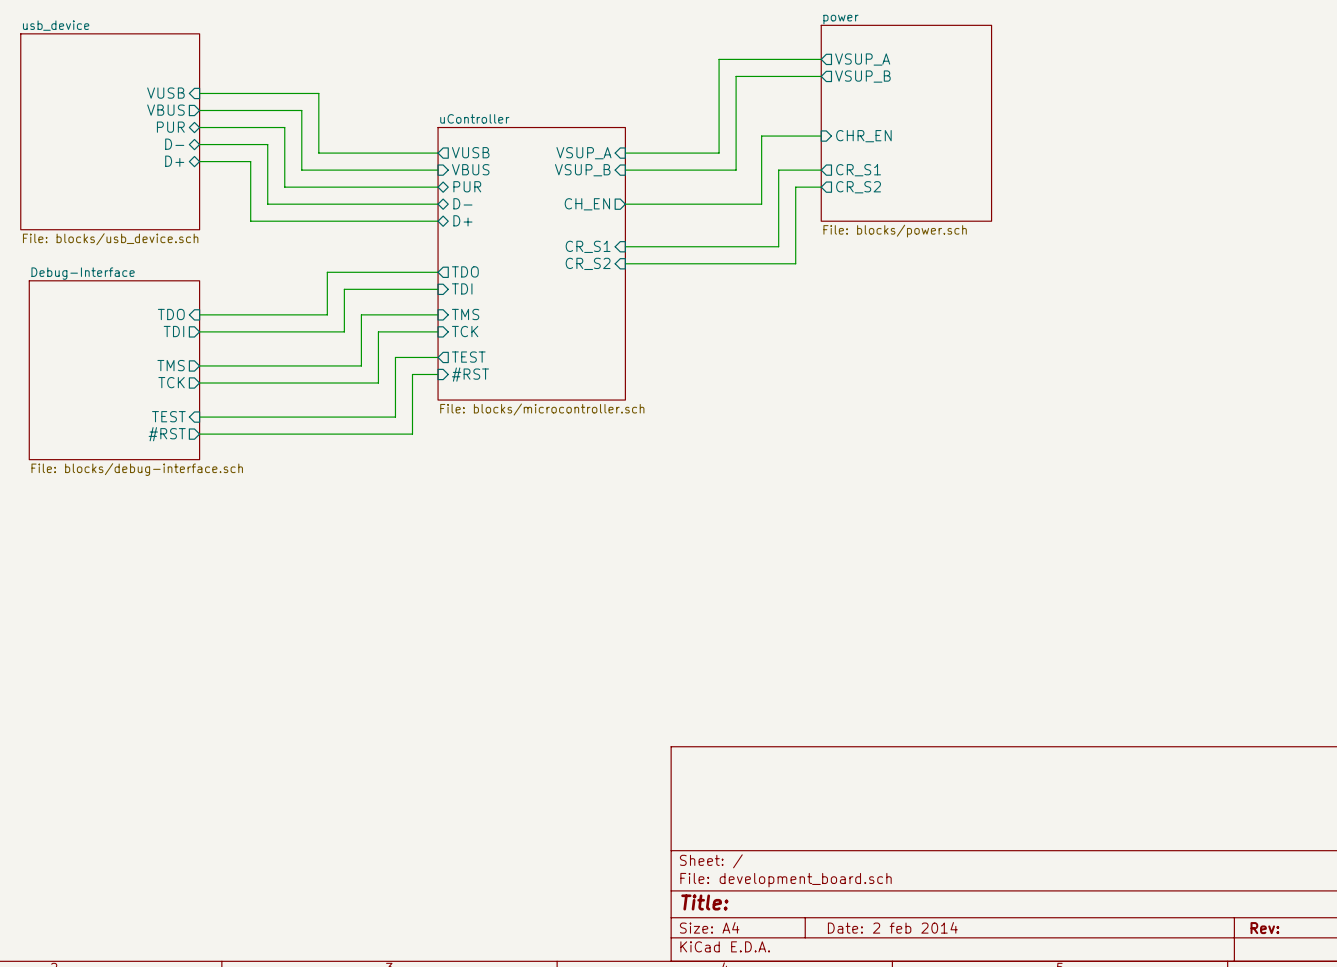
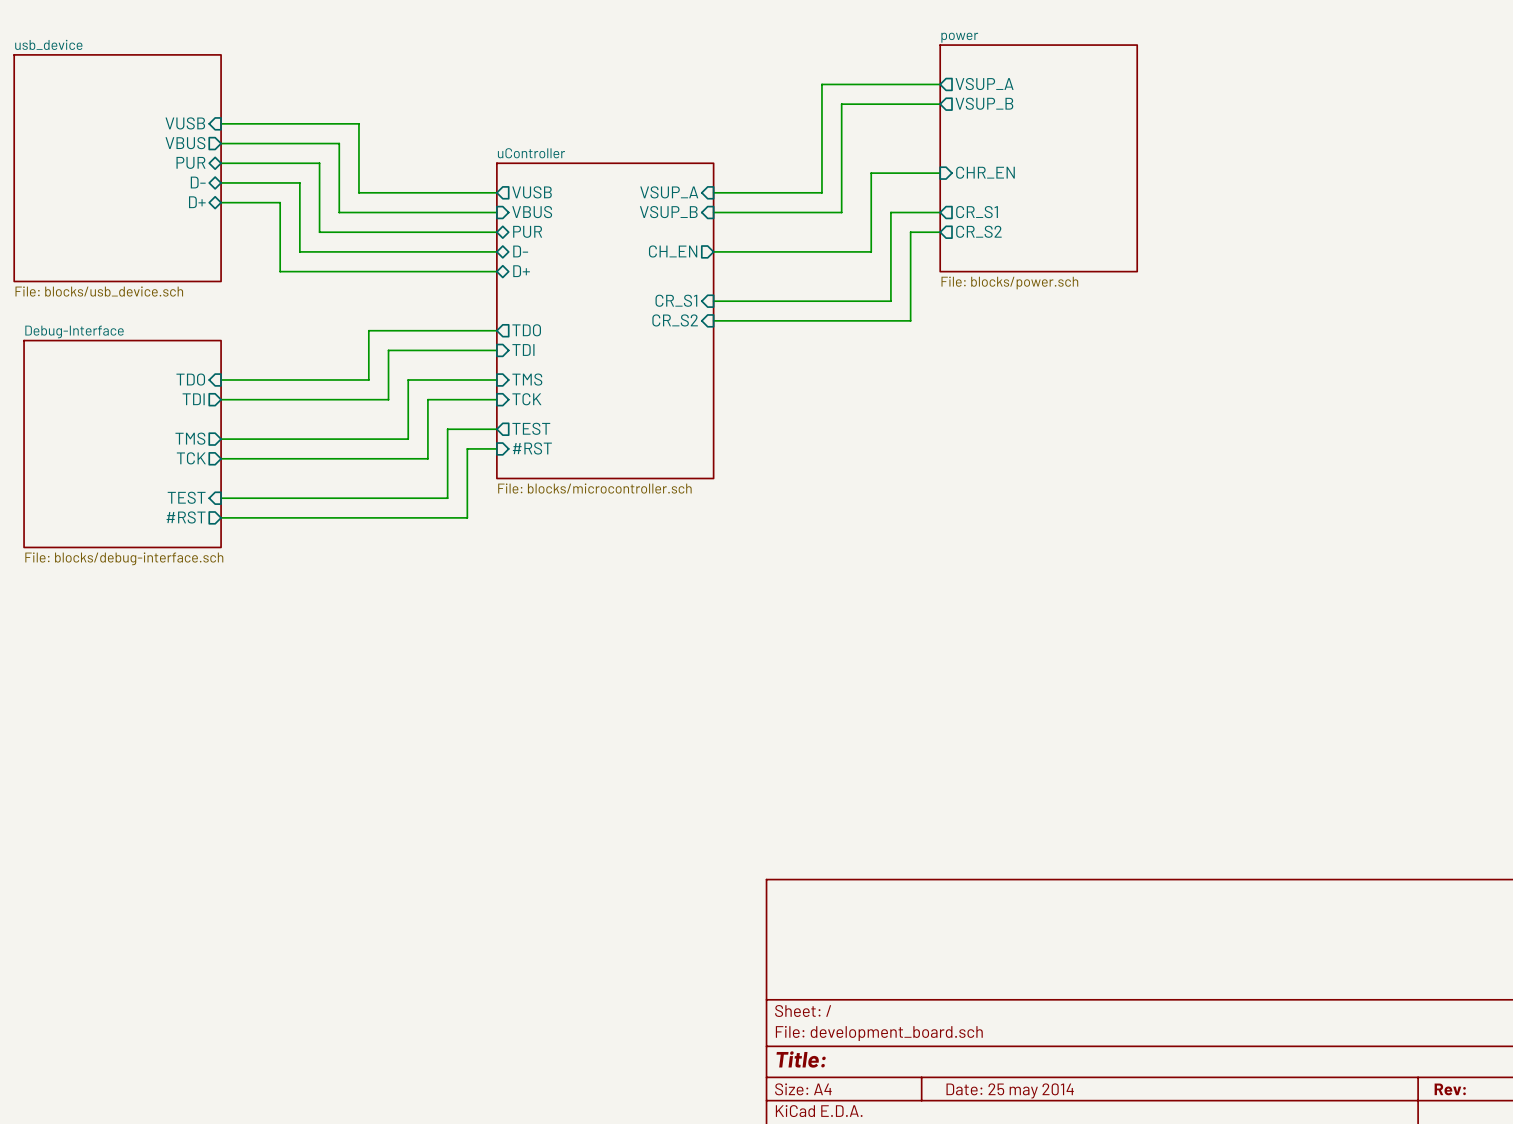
title block: Date: 2 feb 2014 (892, 927) -> Date: 25 may 2014 (1010, 1090)

